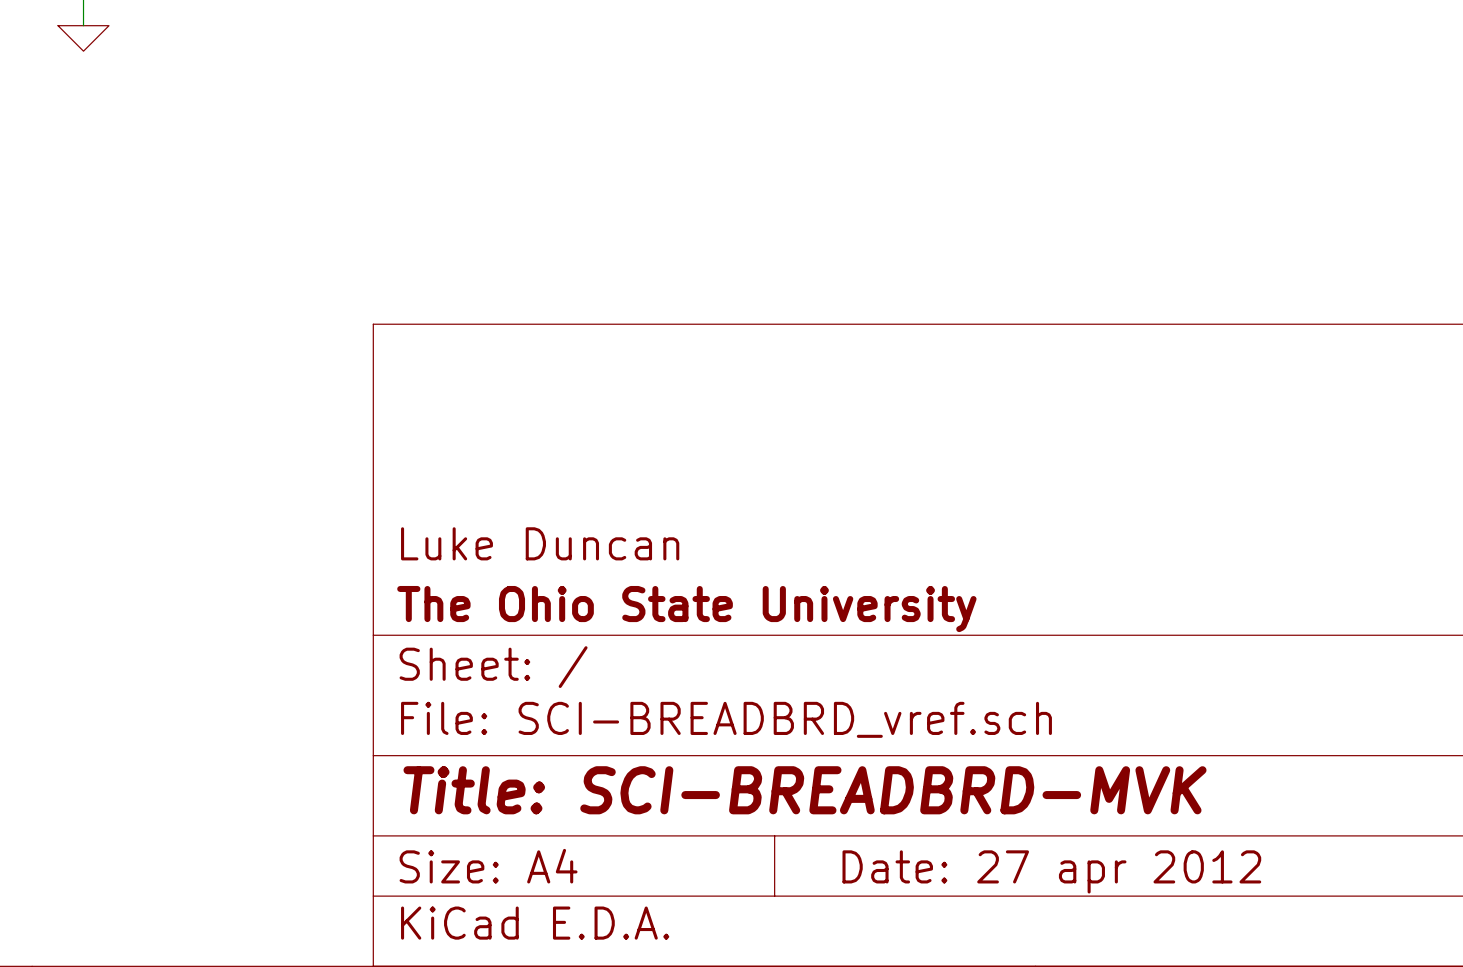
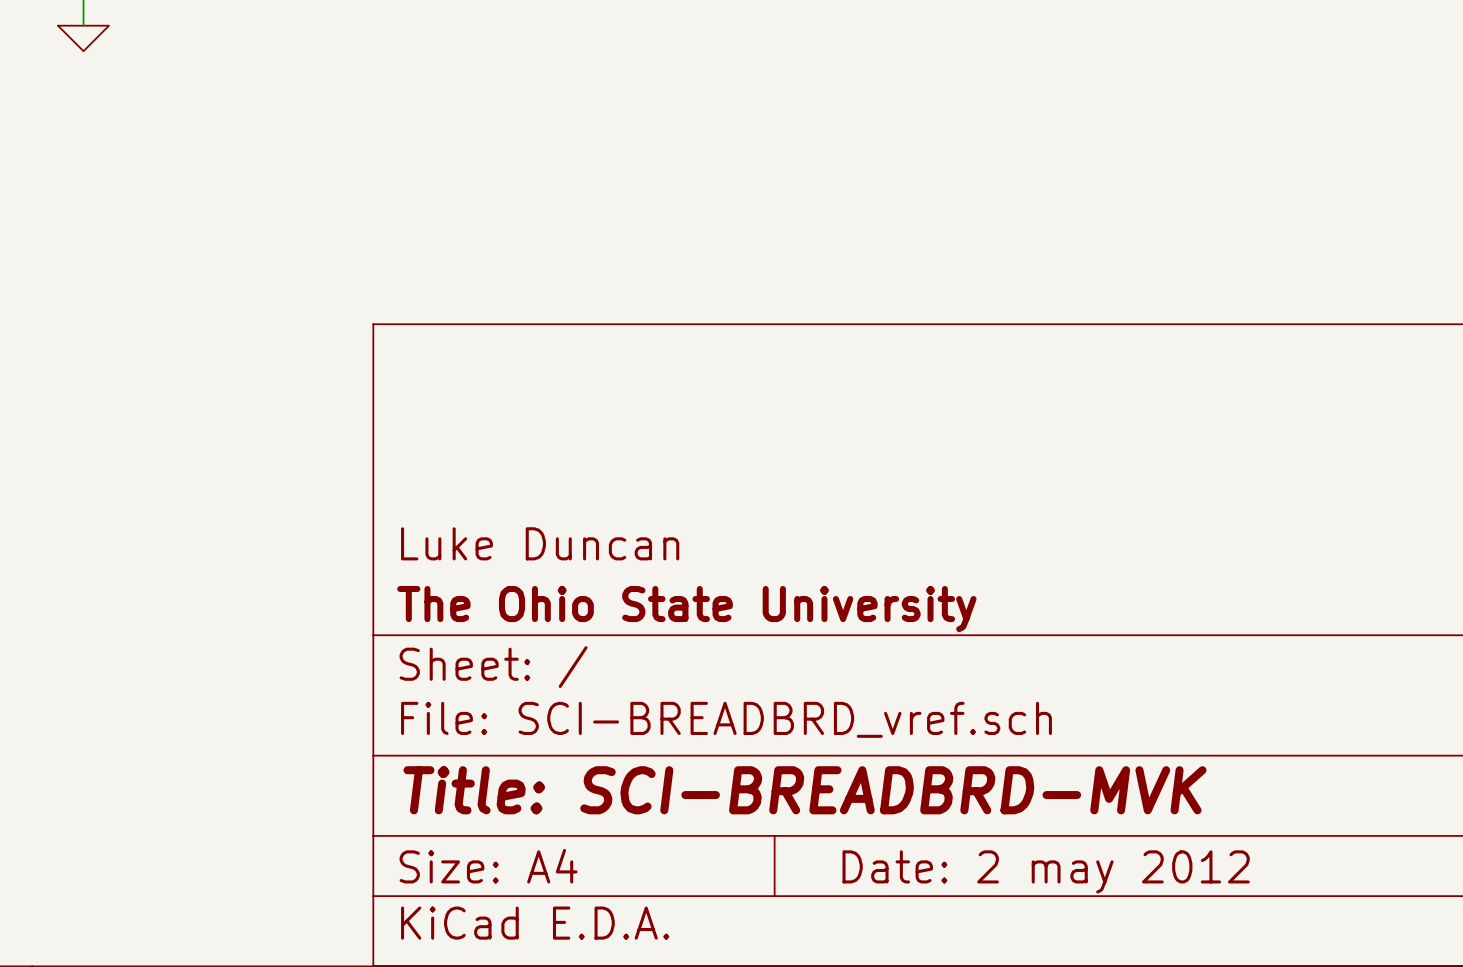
title block: Date: 27 apr 2012 (1051, 871) -> Date: 2 may 2012 (1046, 871)

